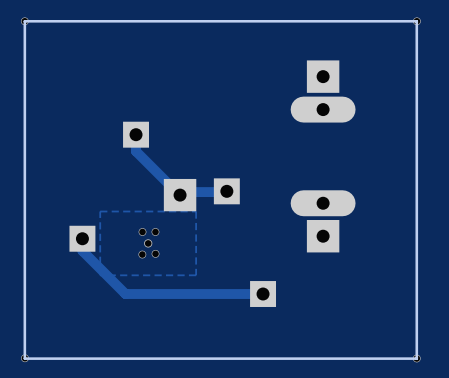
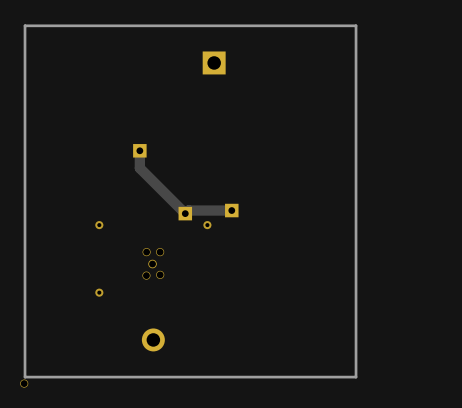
via: (24, 21) -> none
board edge: (416, 21) (24, 21) (24, 358) (416, 358) (416, 21) -> (356, 25) (356, 377) (25, 377) (25, 25) (356, 25)
via: (416, 21) -> none
part: none -> (214, 62)
part: (323, 91) -> none
part footprint: [123, 121, 149, 148] -> [133, 144, 147, 158]
part footprint: [163, 178, 197, 212] -> [178, 206, 193, 221]
part footprint: [213, 178, 240, 205] -> [225, 203, 239, 218]
via: none -> (99, 225)
via: none -> (207, 225)
zone outline: (196, 211) (196, 275) (100, 275) (100, 211) (196, 211) -> none
part: (323, 221) -> none
track: (82, 238) (82, 250) (125, 294) (263, 294) -> none
part: (82, 238) -> none
via: none -> (99, 292)
part: (263, 294) -> none
part: none -> (153, 339)
via: (416, 358) -> none

